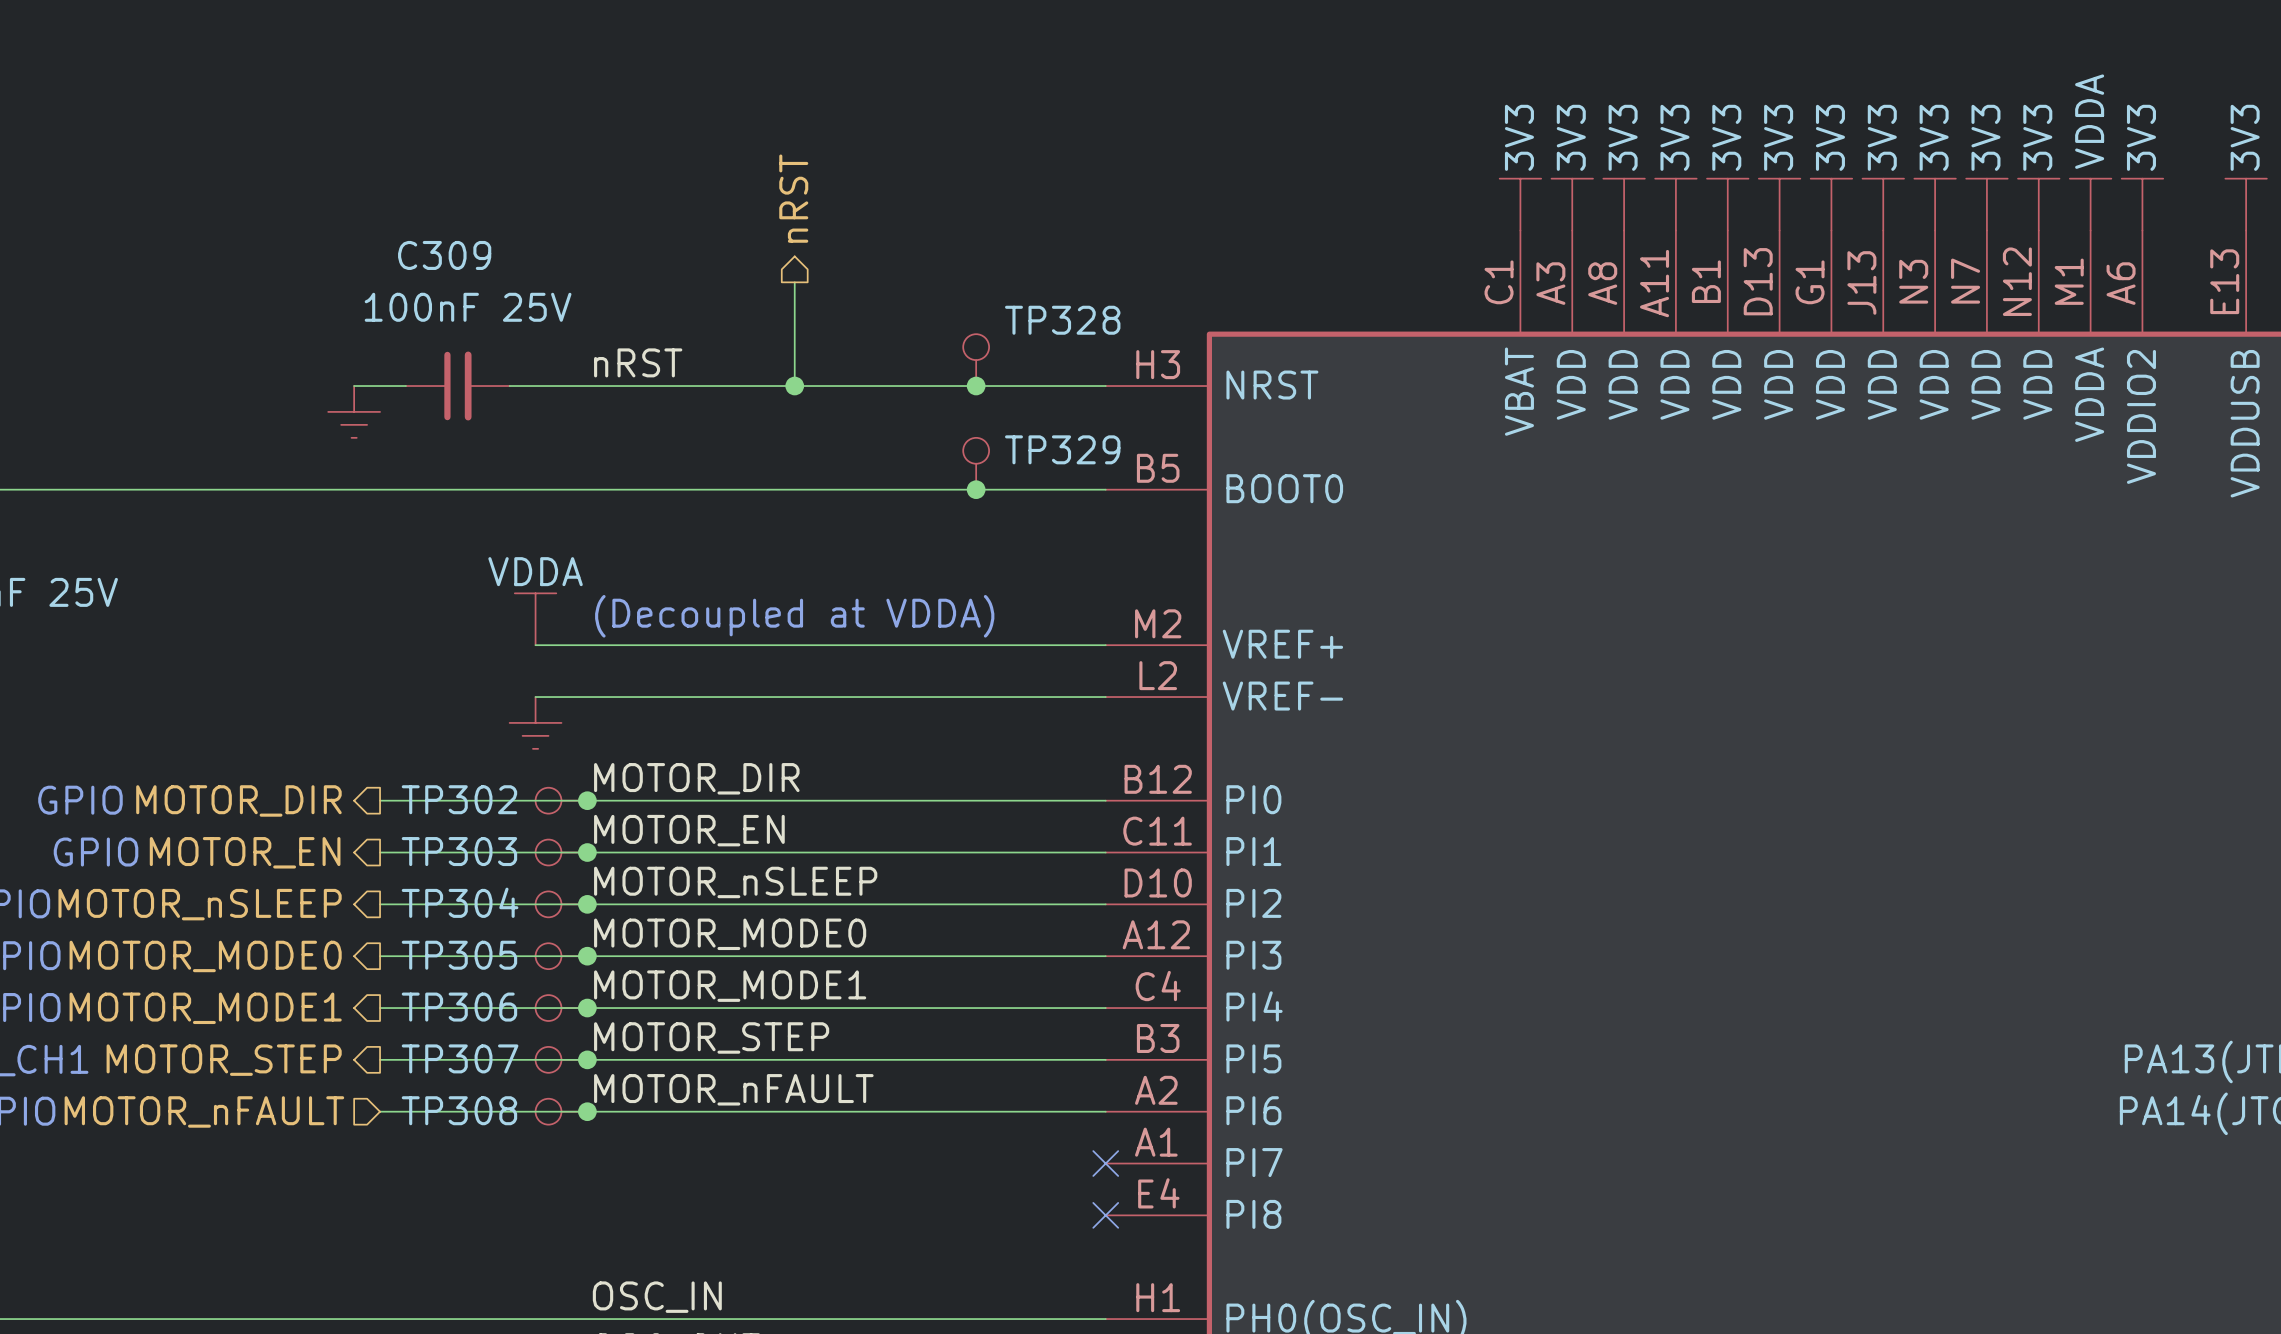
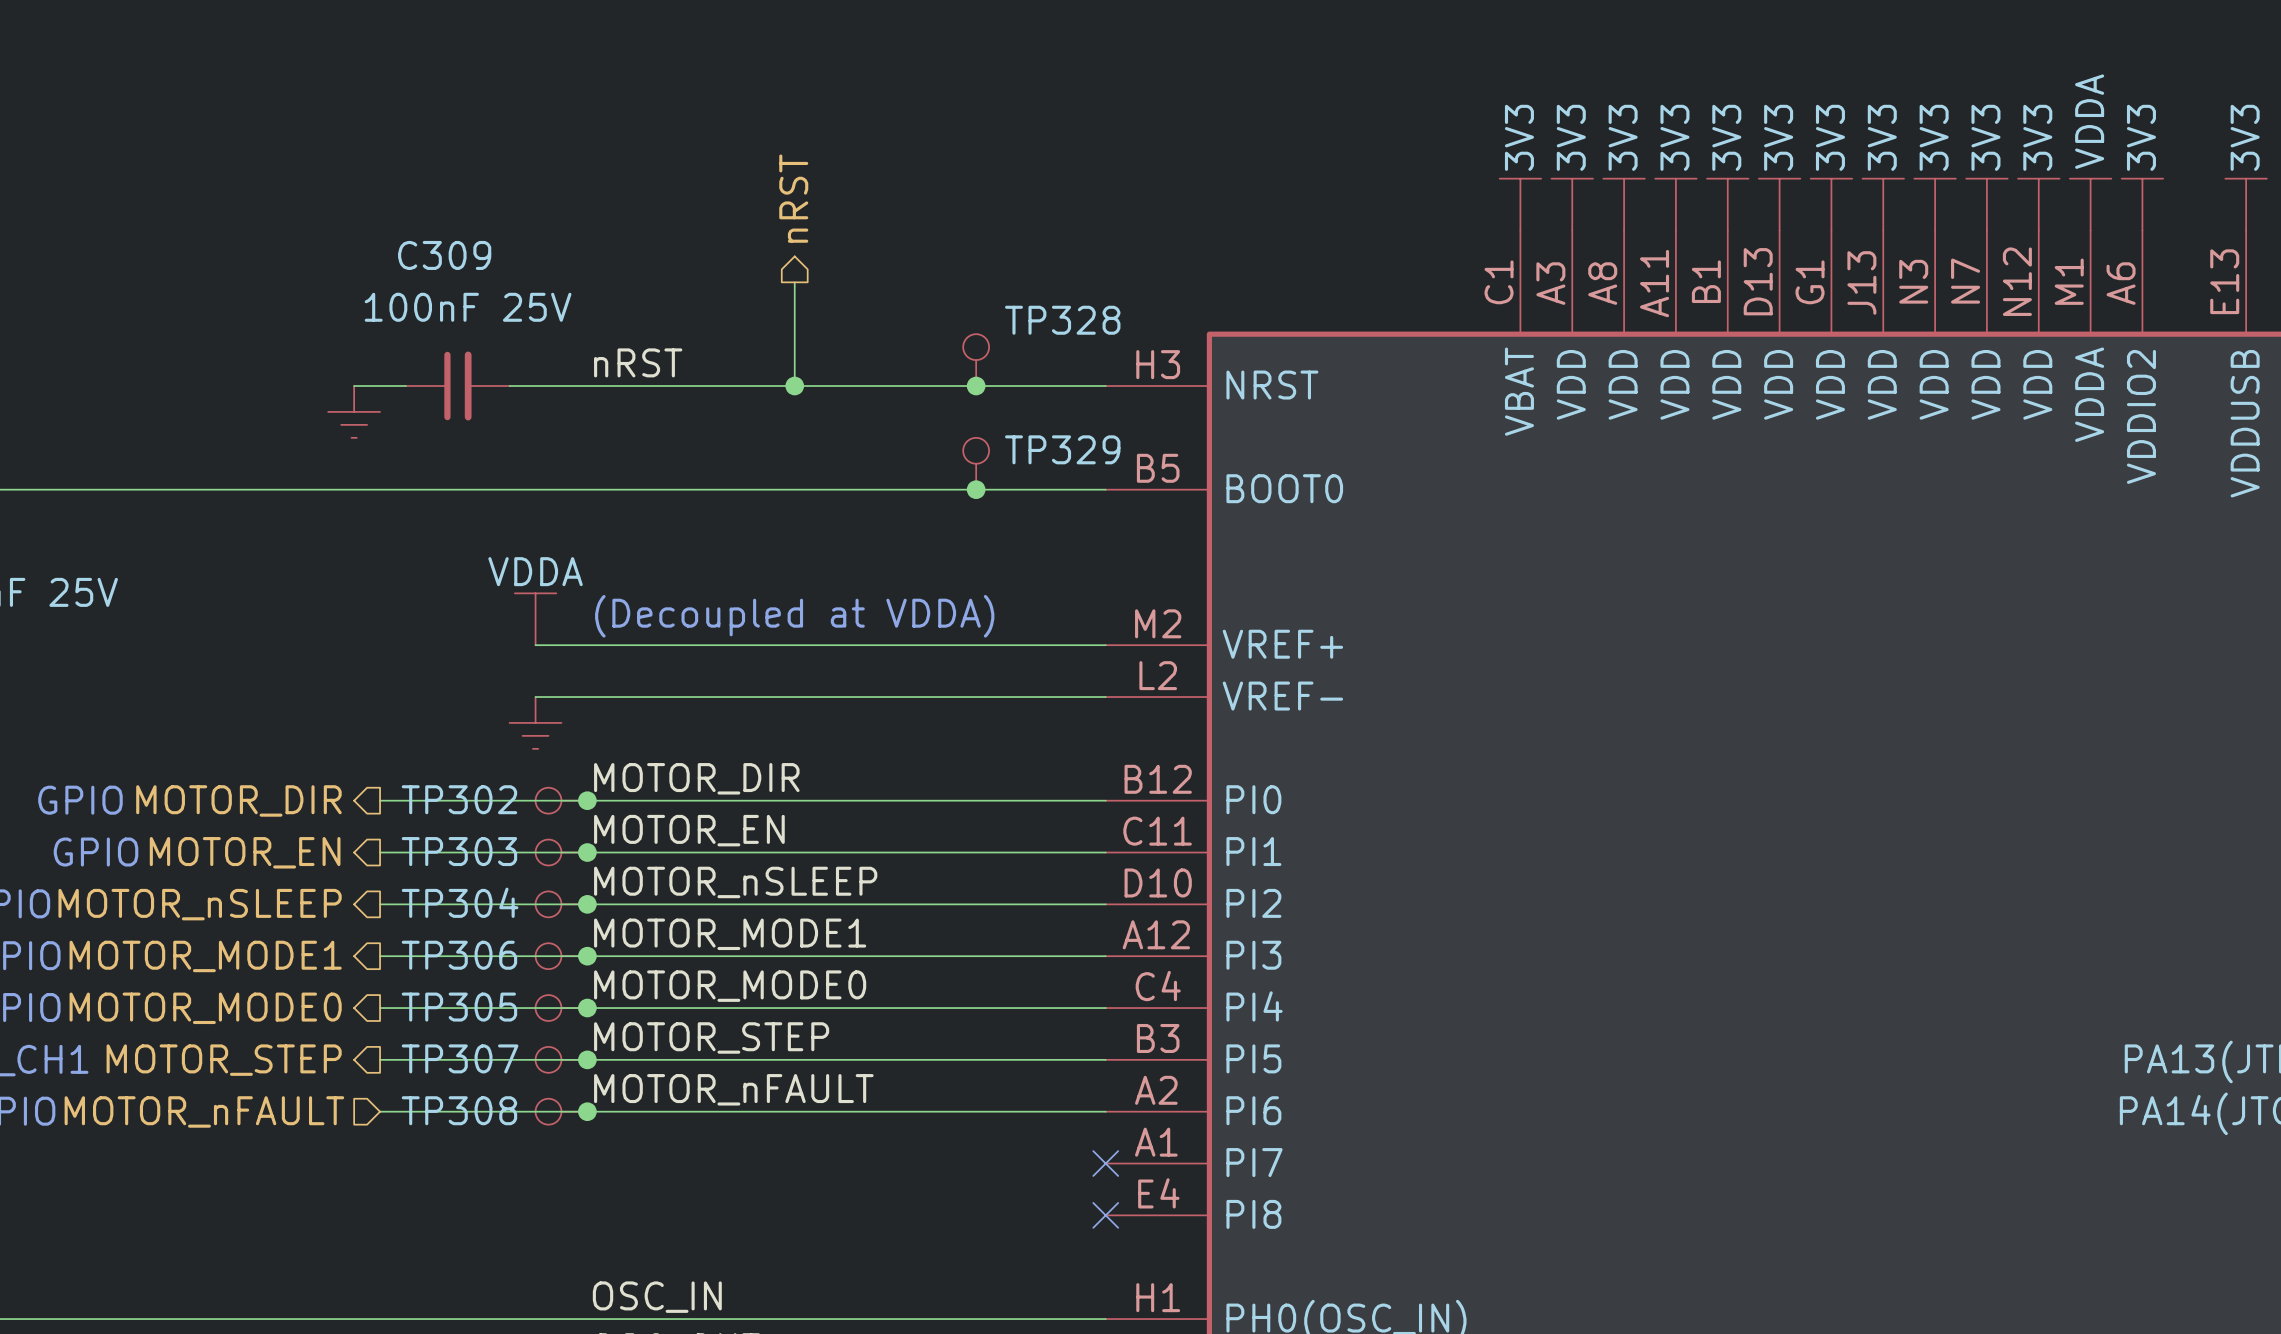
label: MOTOR_MODE0 (730, 934) -> MOTOR_MODE1 (730, 934)
TP305 name: TP305 (459, 955) -> TP306 (459, 955)
hierarchical label: MOTOR_MODE0 (205, 956) -> MOTOR_MODE1 (205, 956)
label: MOTOR_MODE1 (730, 986) -> MOTOR_MODE0 (730, 986)
TP306 name: TP306 (459, 1007) -> TP305 (459, 1007)
hierarchical label: MOTOR_MODE1 (205, 1008) -> MOTOR_MODE0 (205, 1008)

